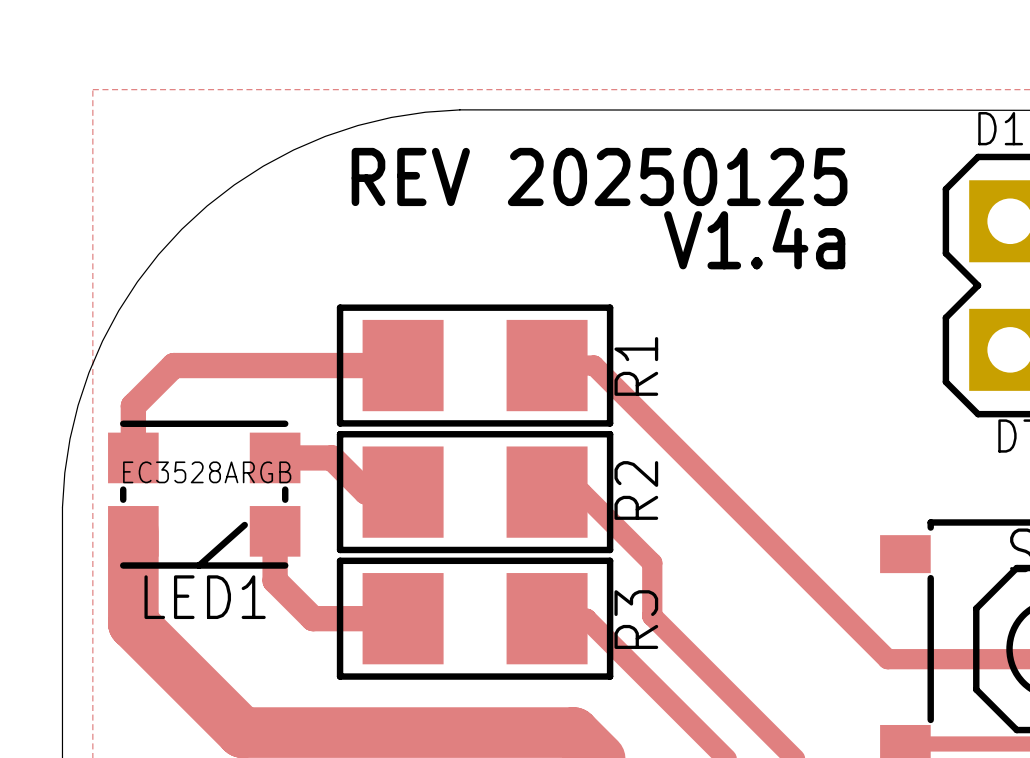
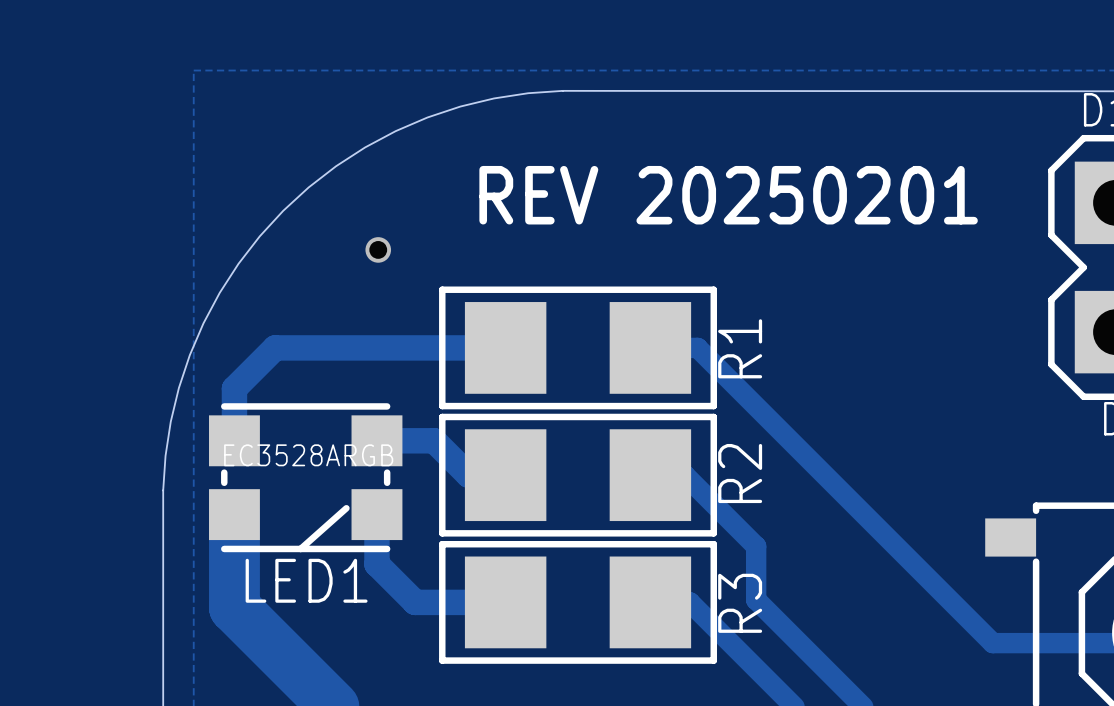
text: REV 20250125 (599, 176) -> REV 20250201 (728, 195)
text: V1.4a (754, 239) -> none
via: none -> (378, 249)

